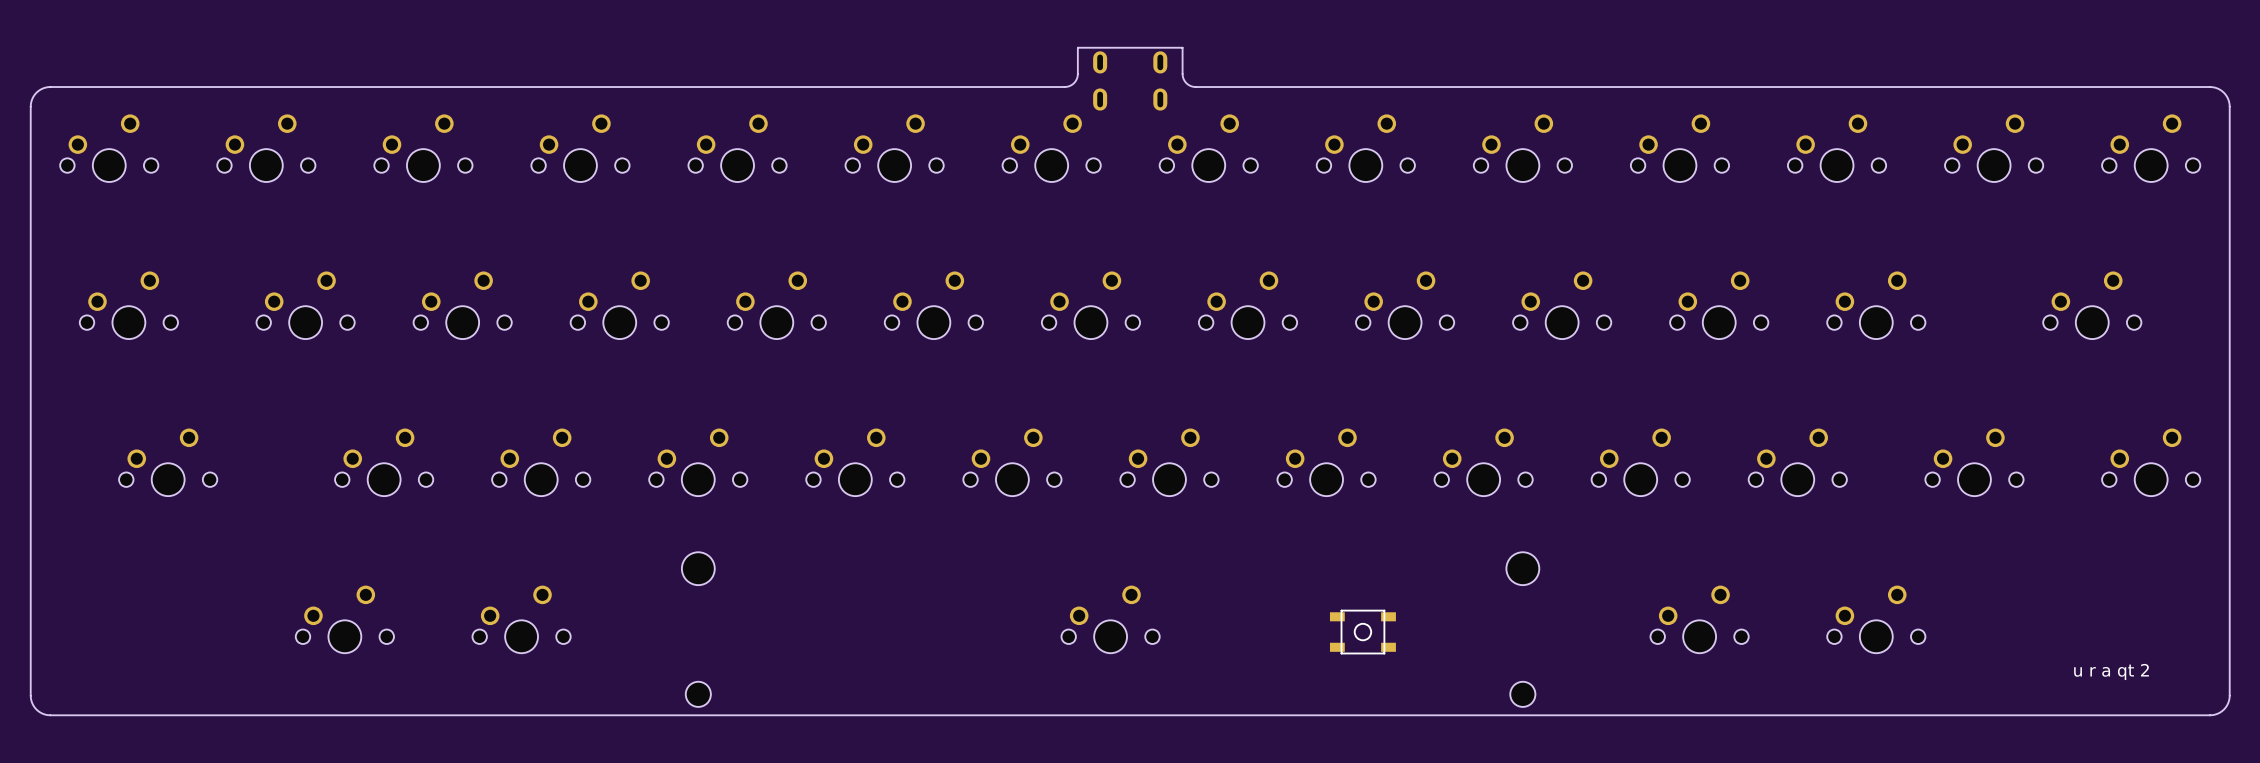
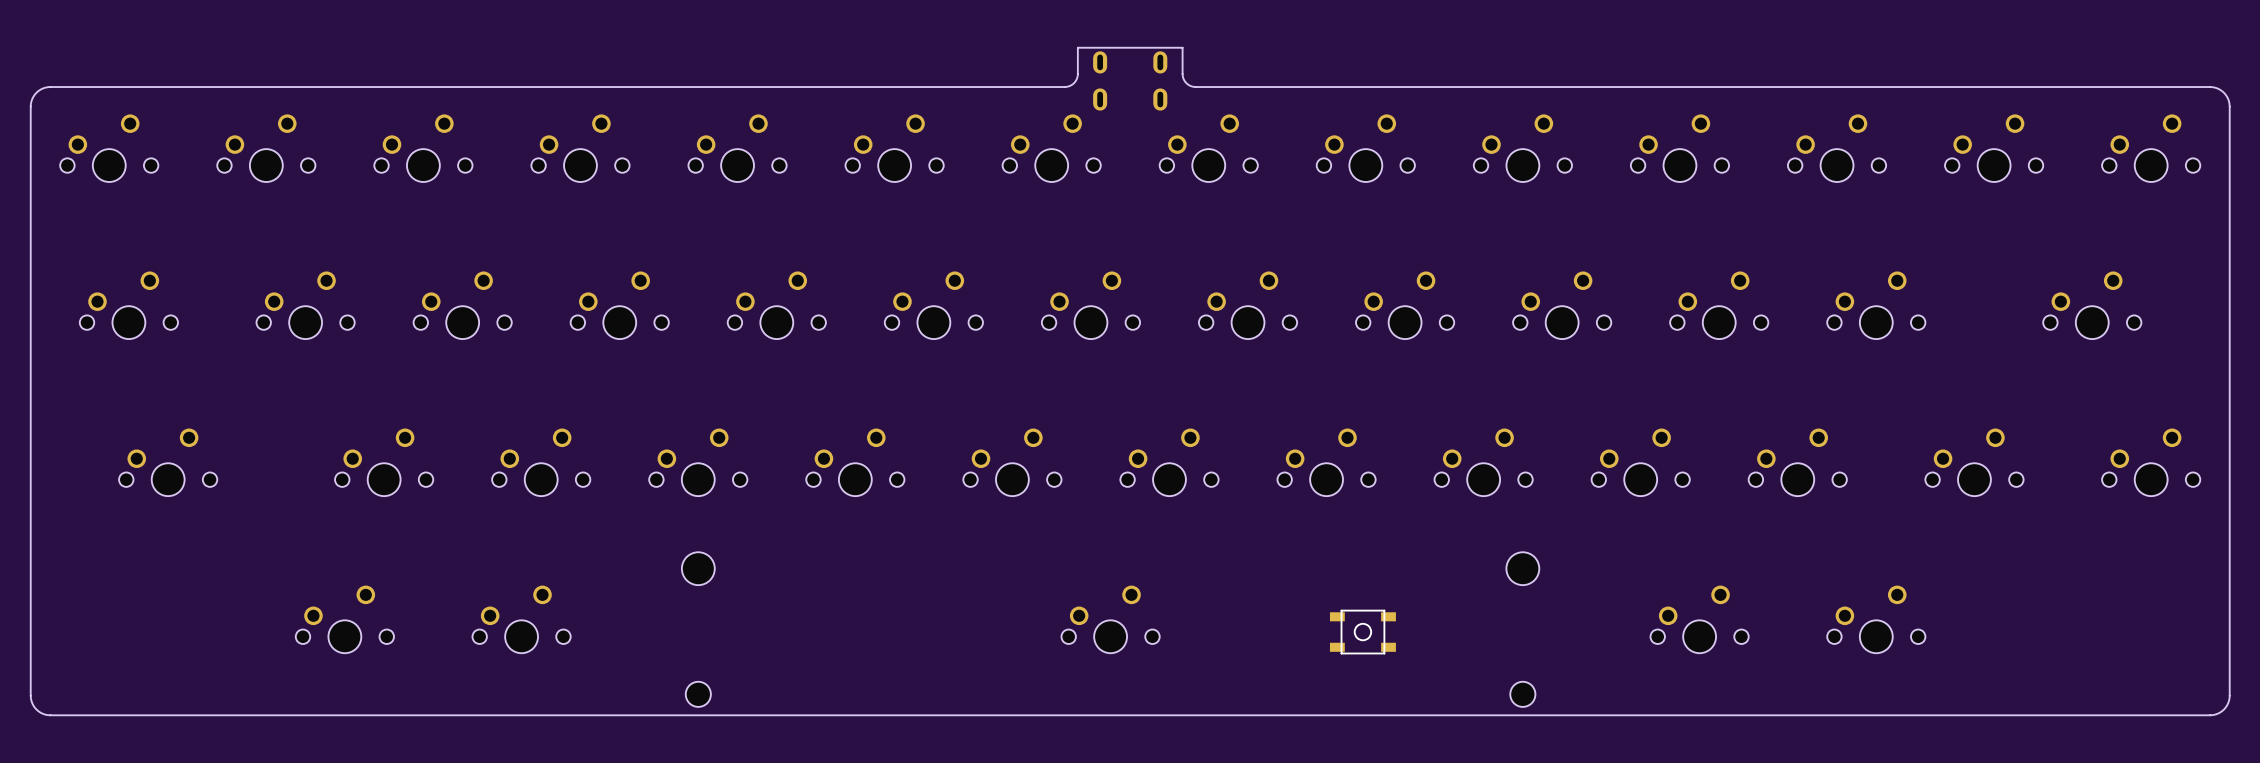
text: u r a qt 2 (2111, 671) -> none

